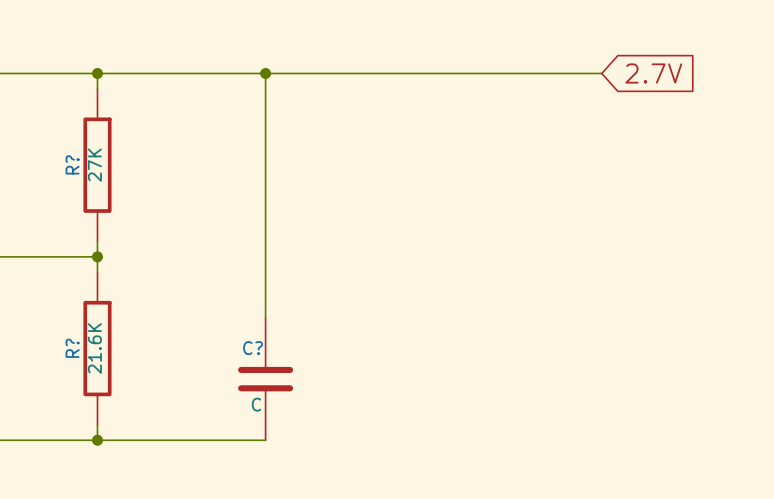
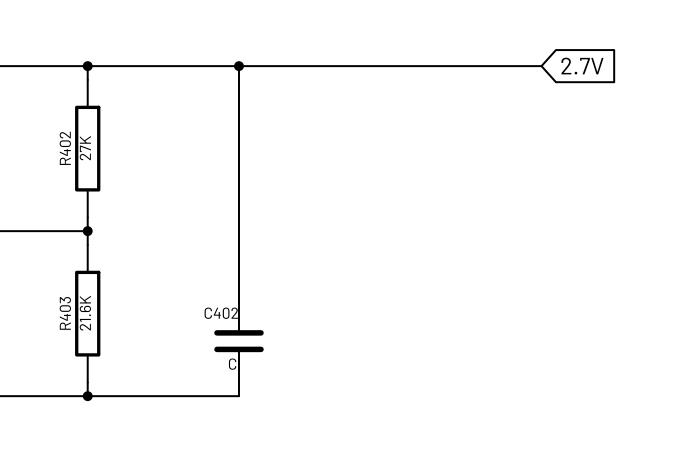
R? name: R? (72, 164) -> R402 (65, 148)
R? name: R? (72, 348) -> R403 (65, 313)
C? name: C? (253, 348) -> C402 (221, 313)

